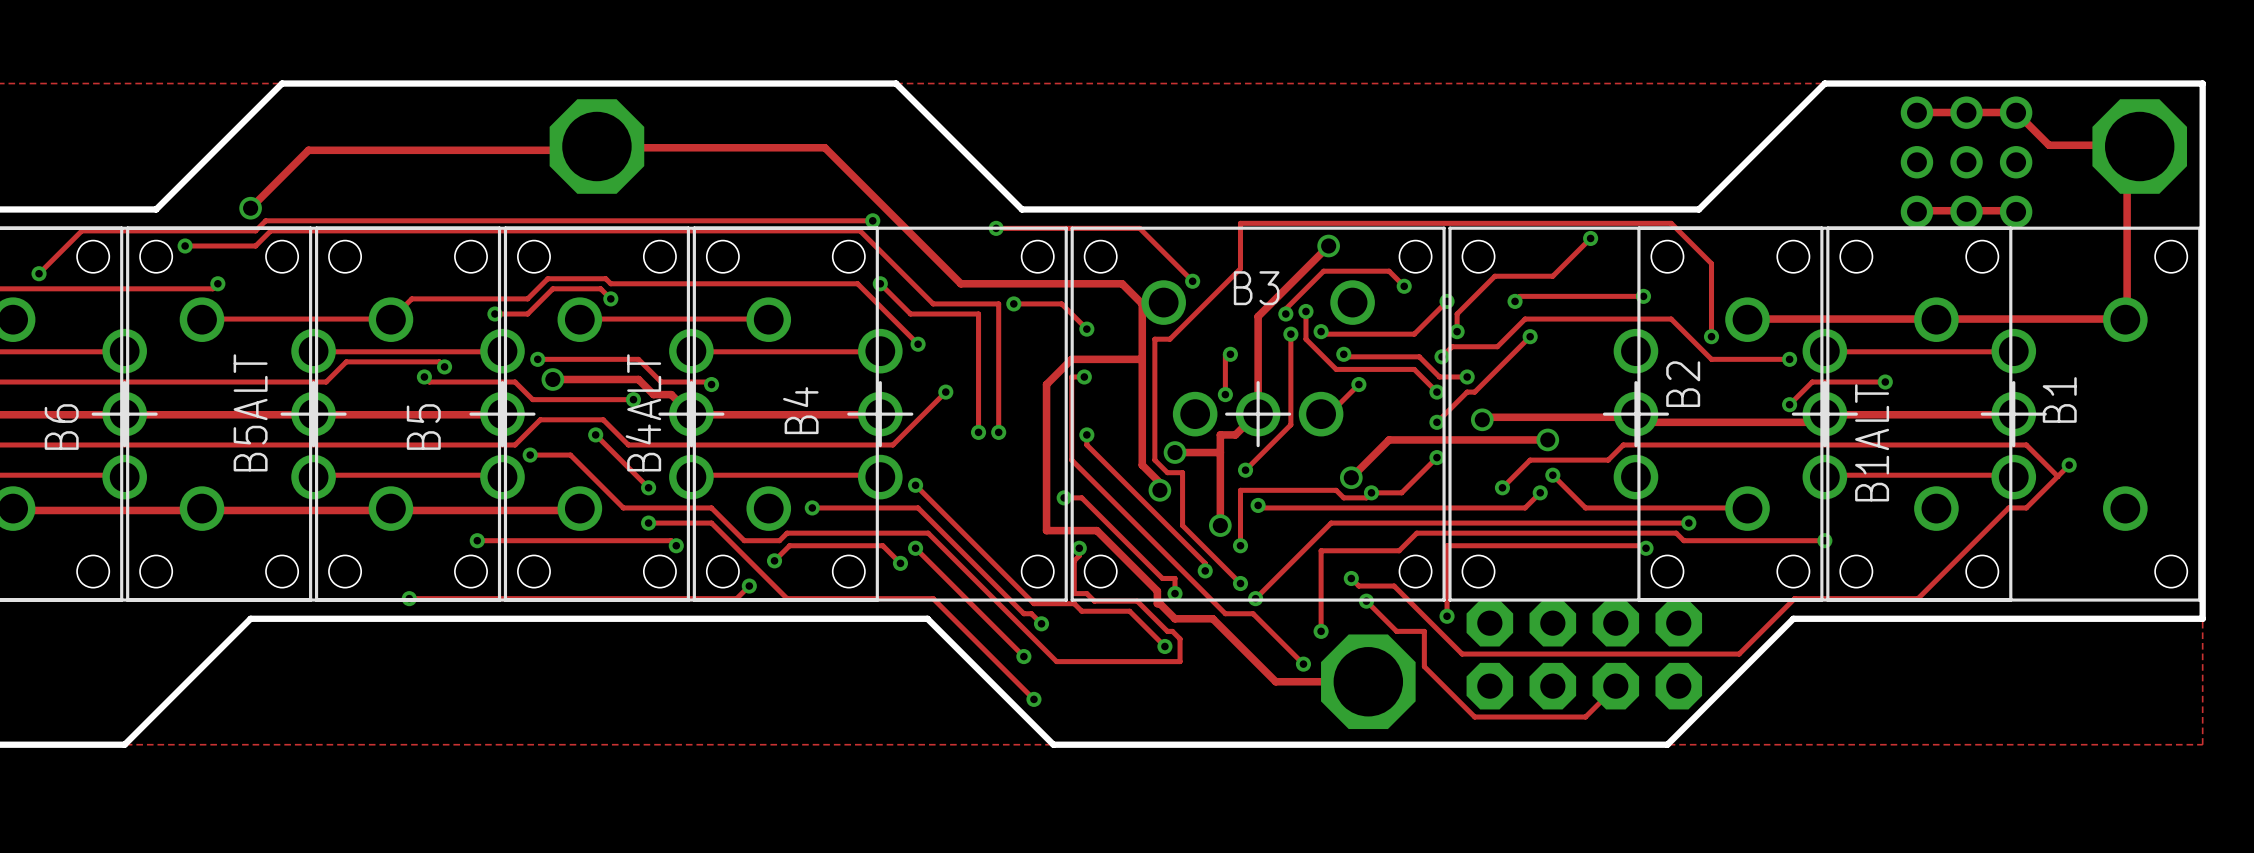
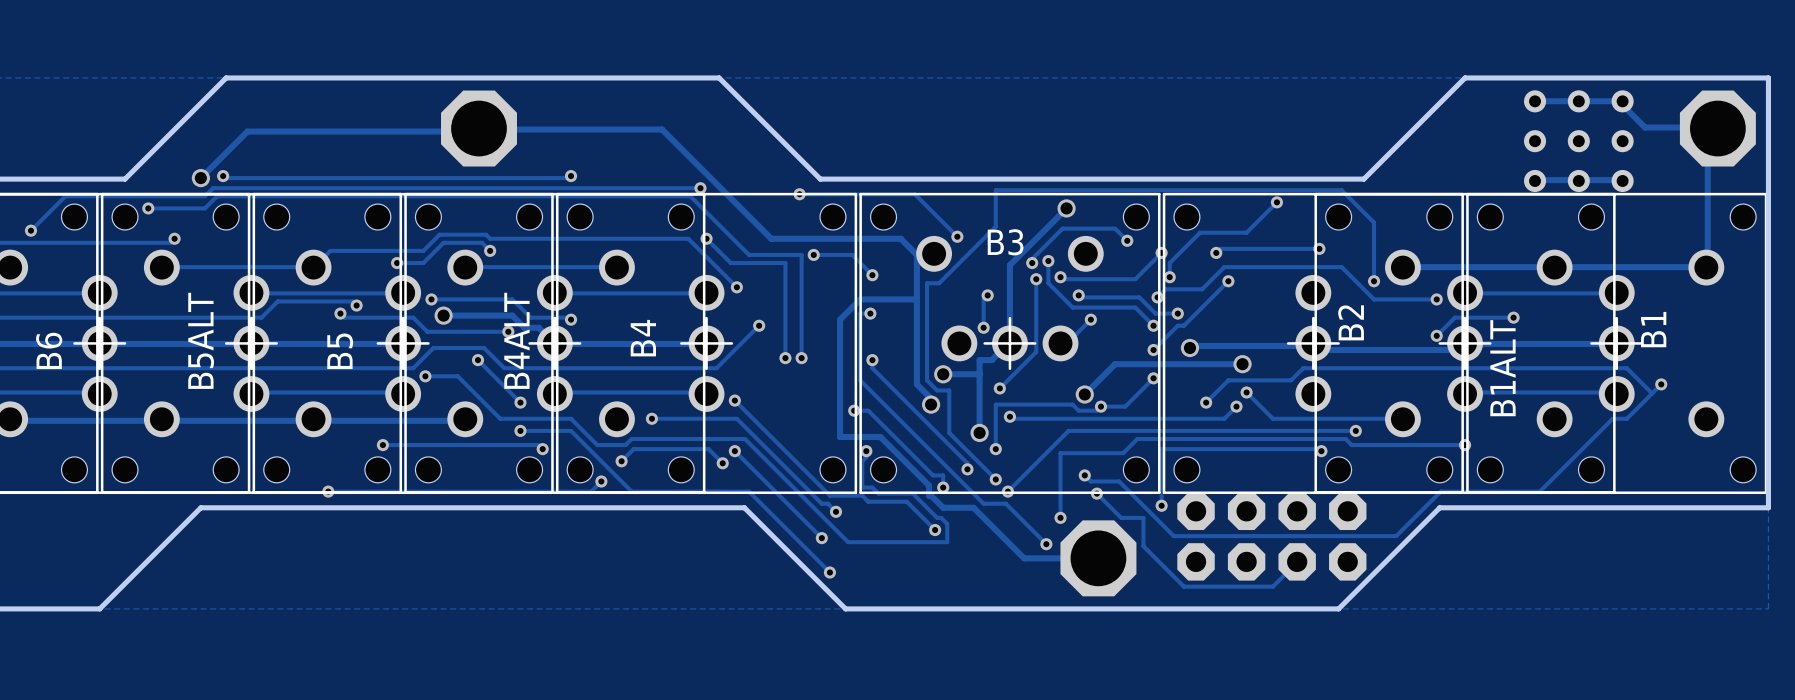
part footprint: [1900, 96, 2033, 229] -> [1524, 90, 1634, 193]
track: none -> (223, 176) (225, 178) (569, 178) (571, 176)
via: none -> (223, 176)
via: none -> (571, 176)

